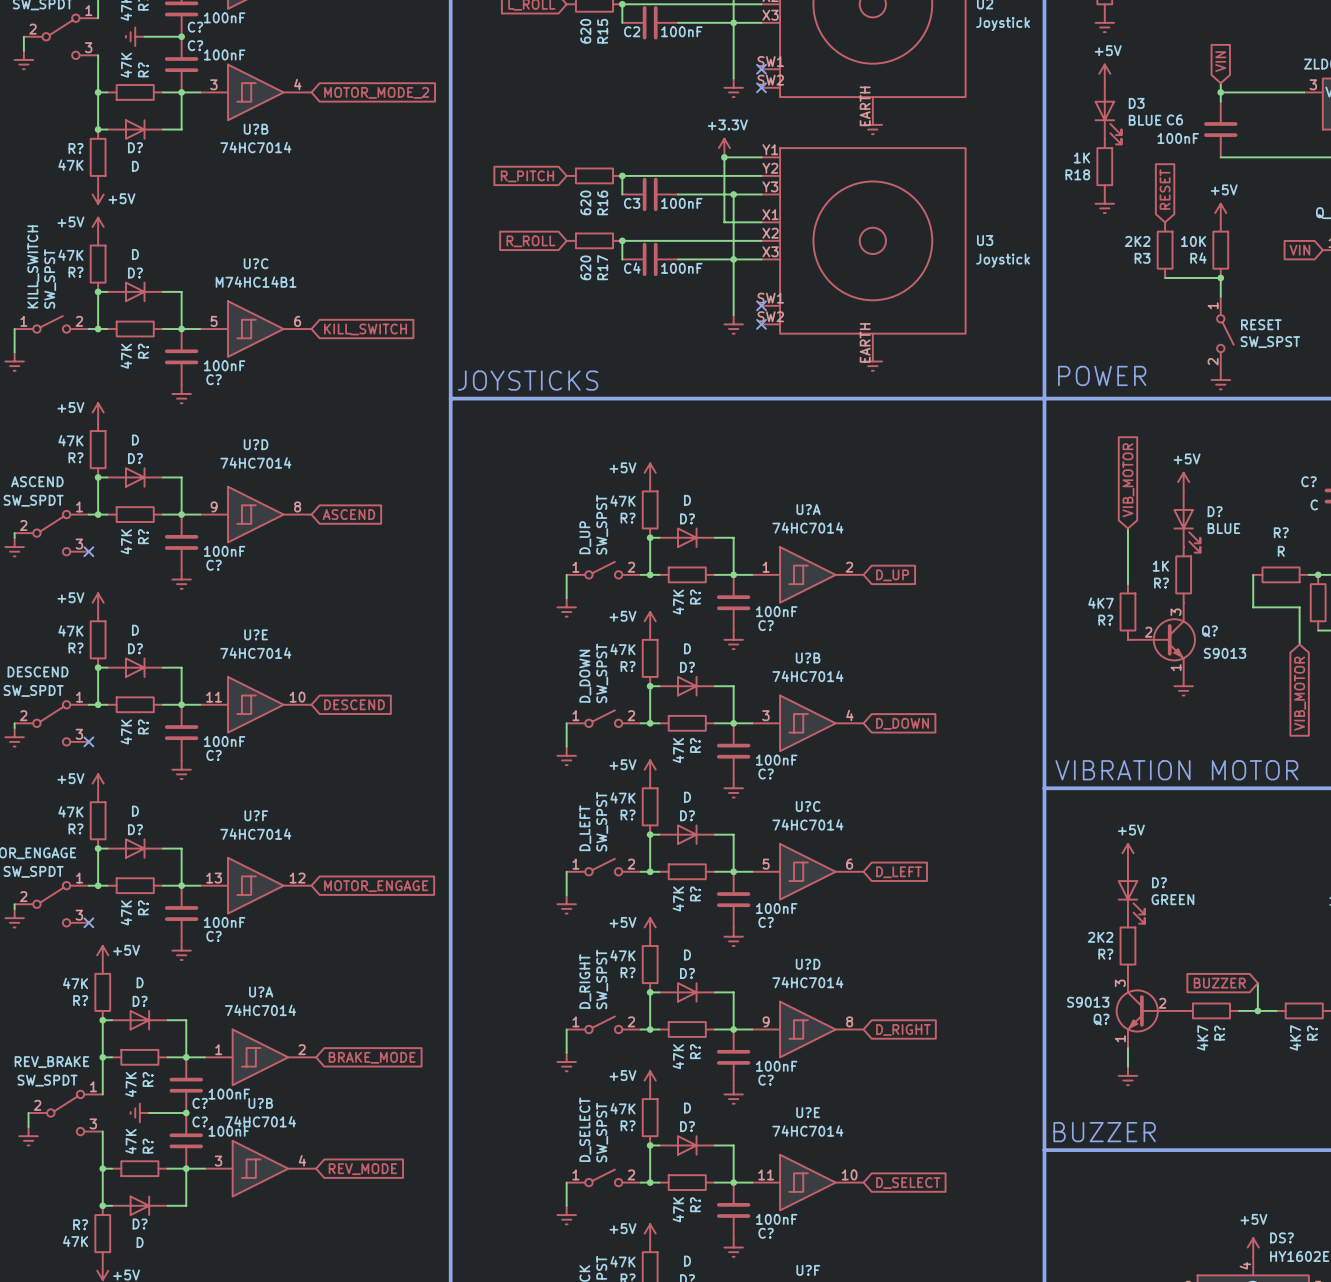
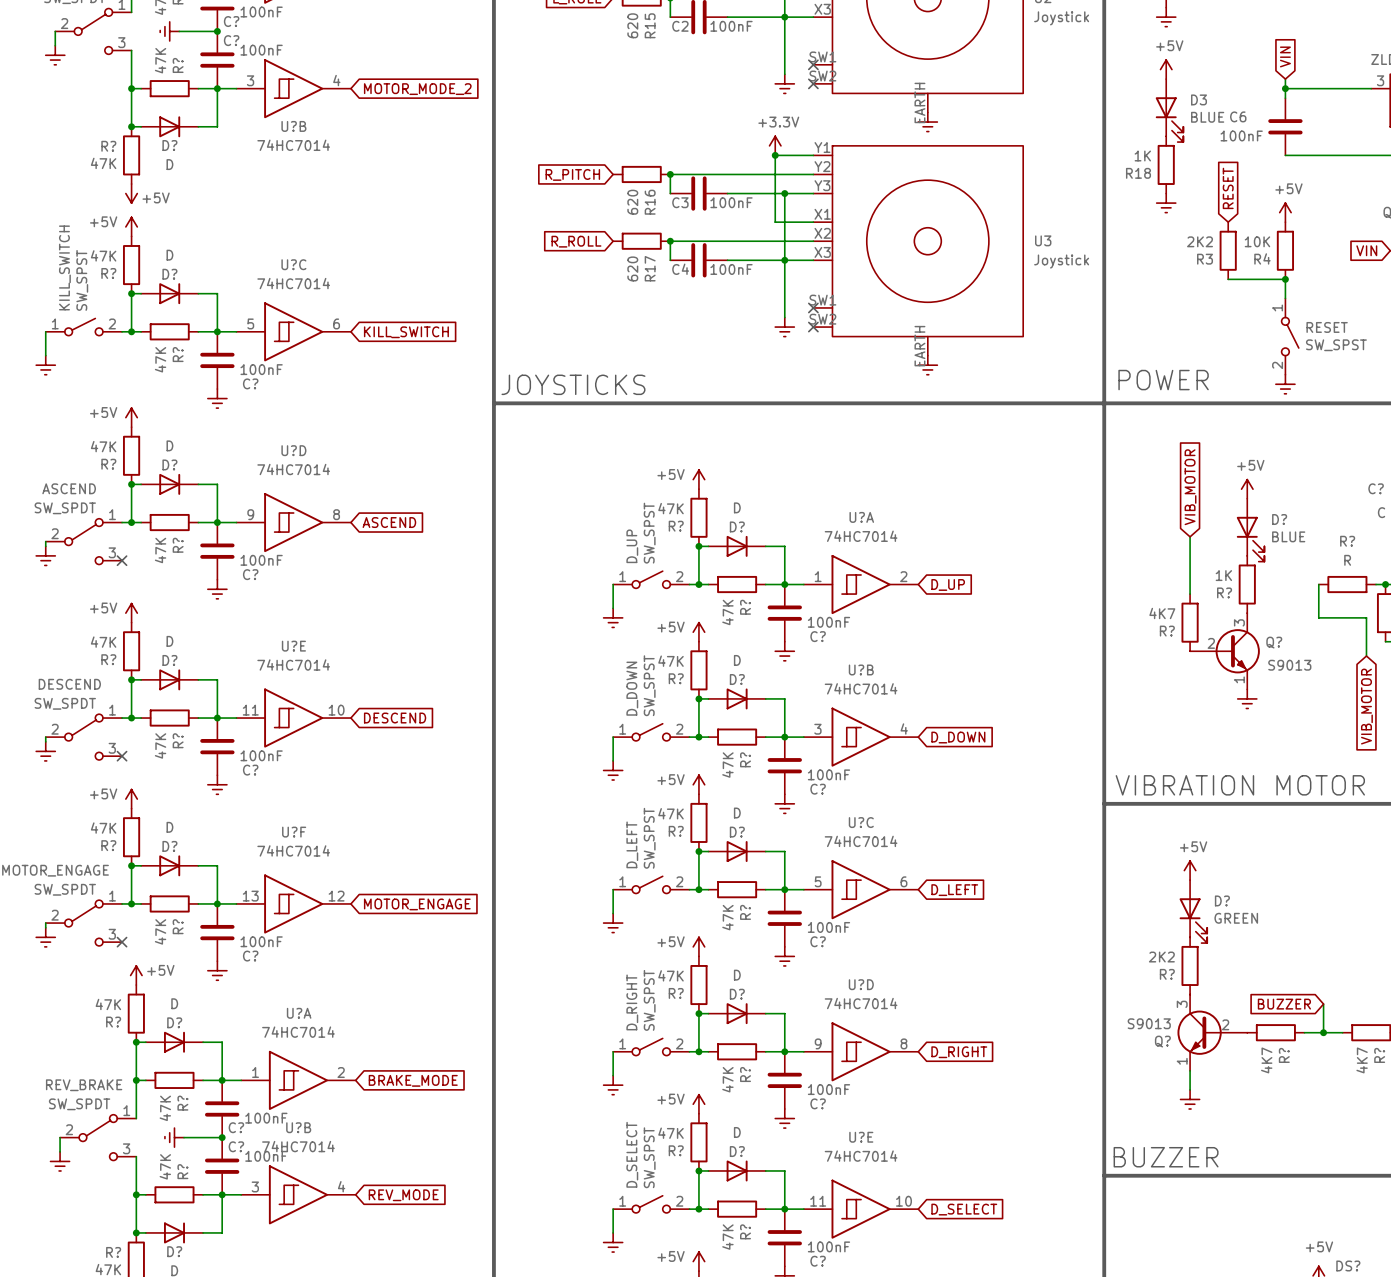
U?C value: M74HC14B1 (256, 282) -> 74HC7014 (293, 283)

